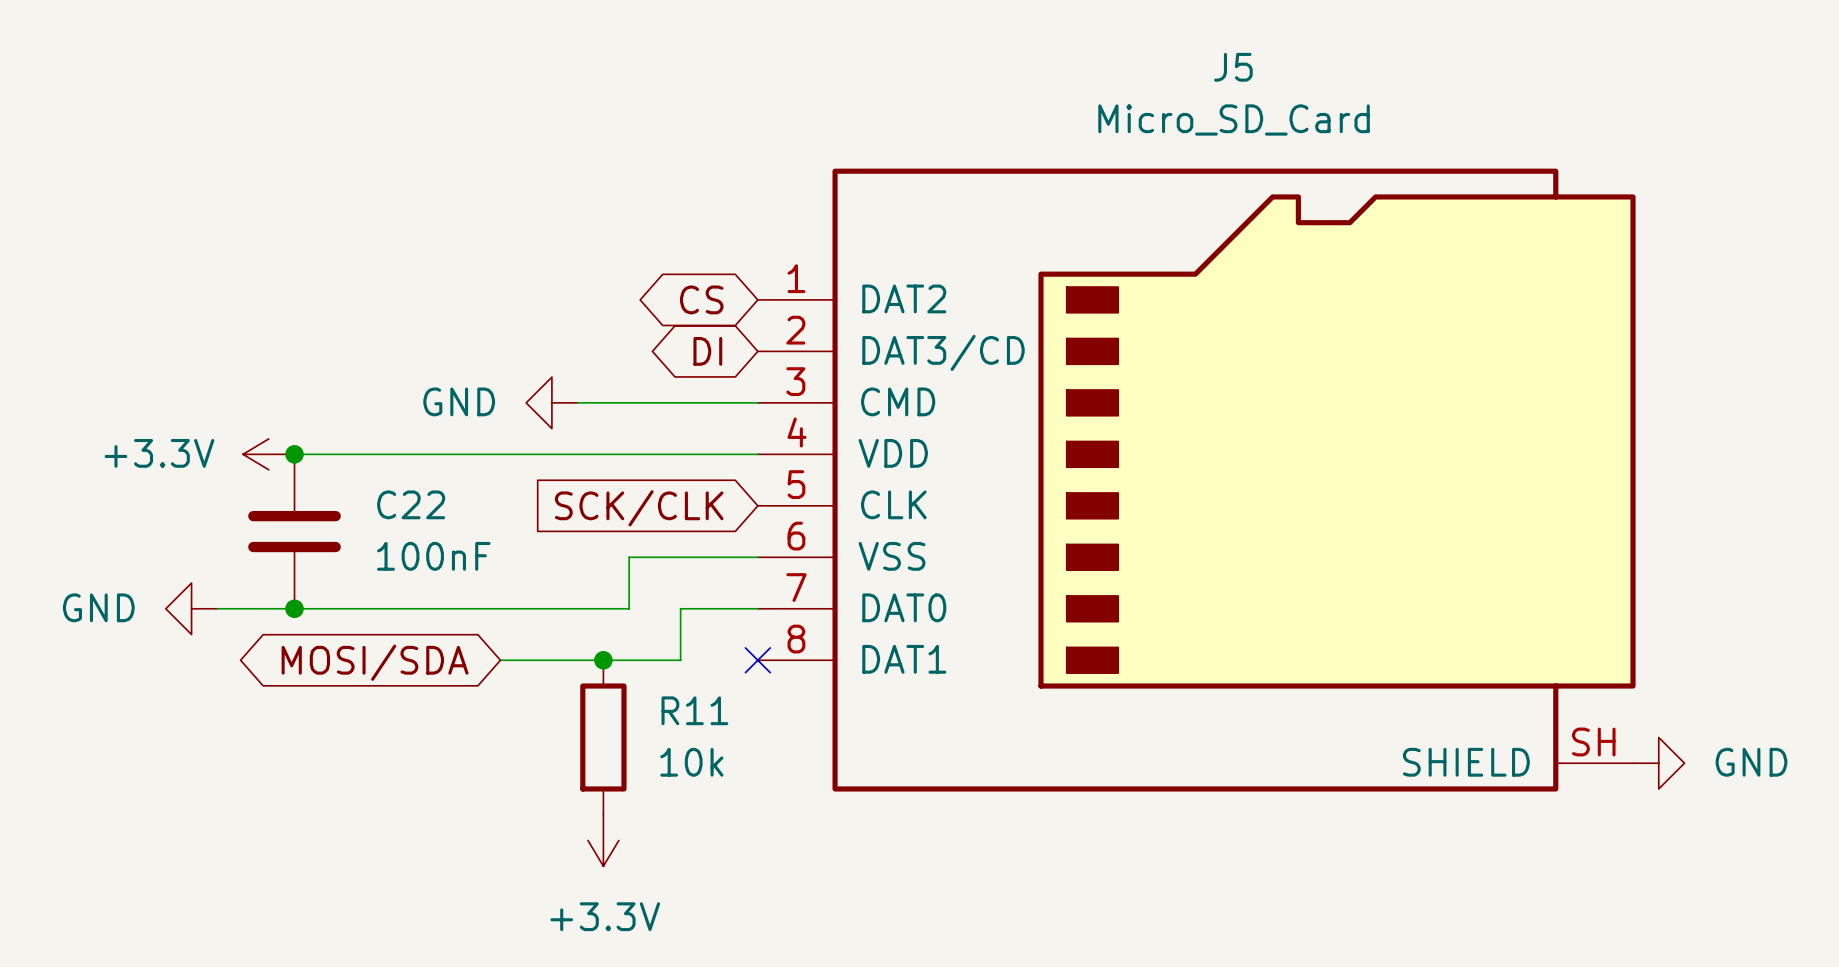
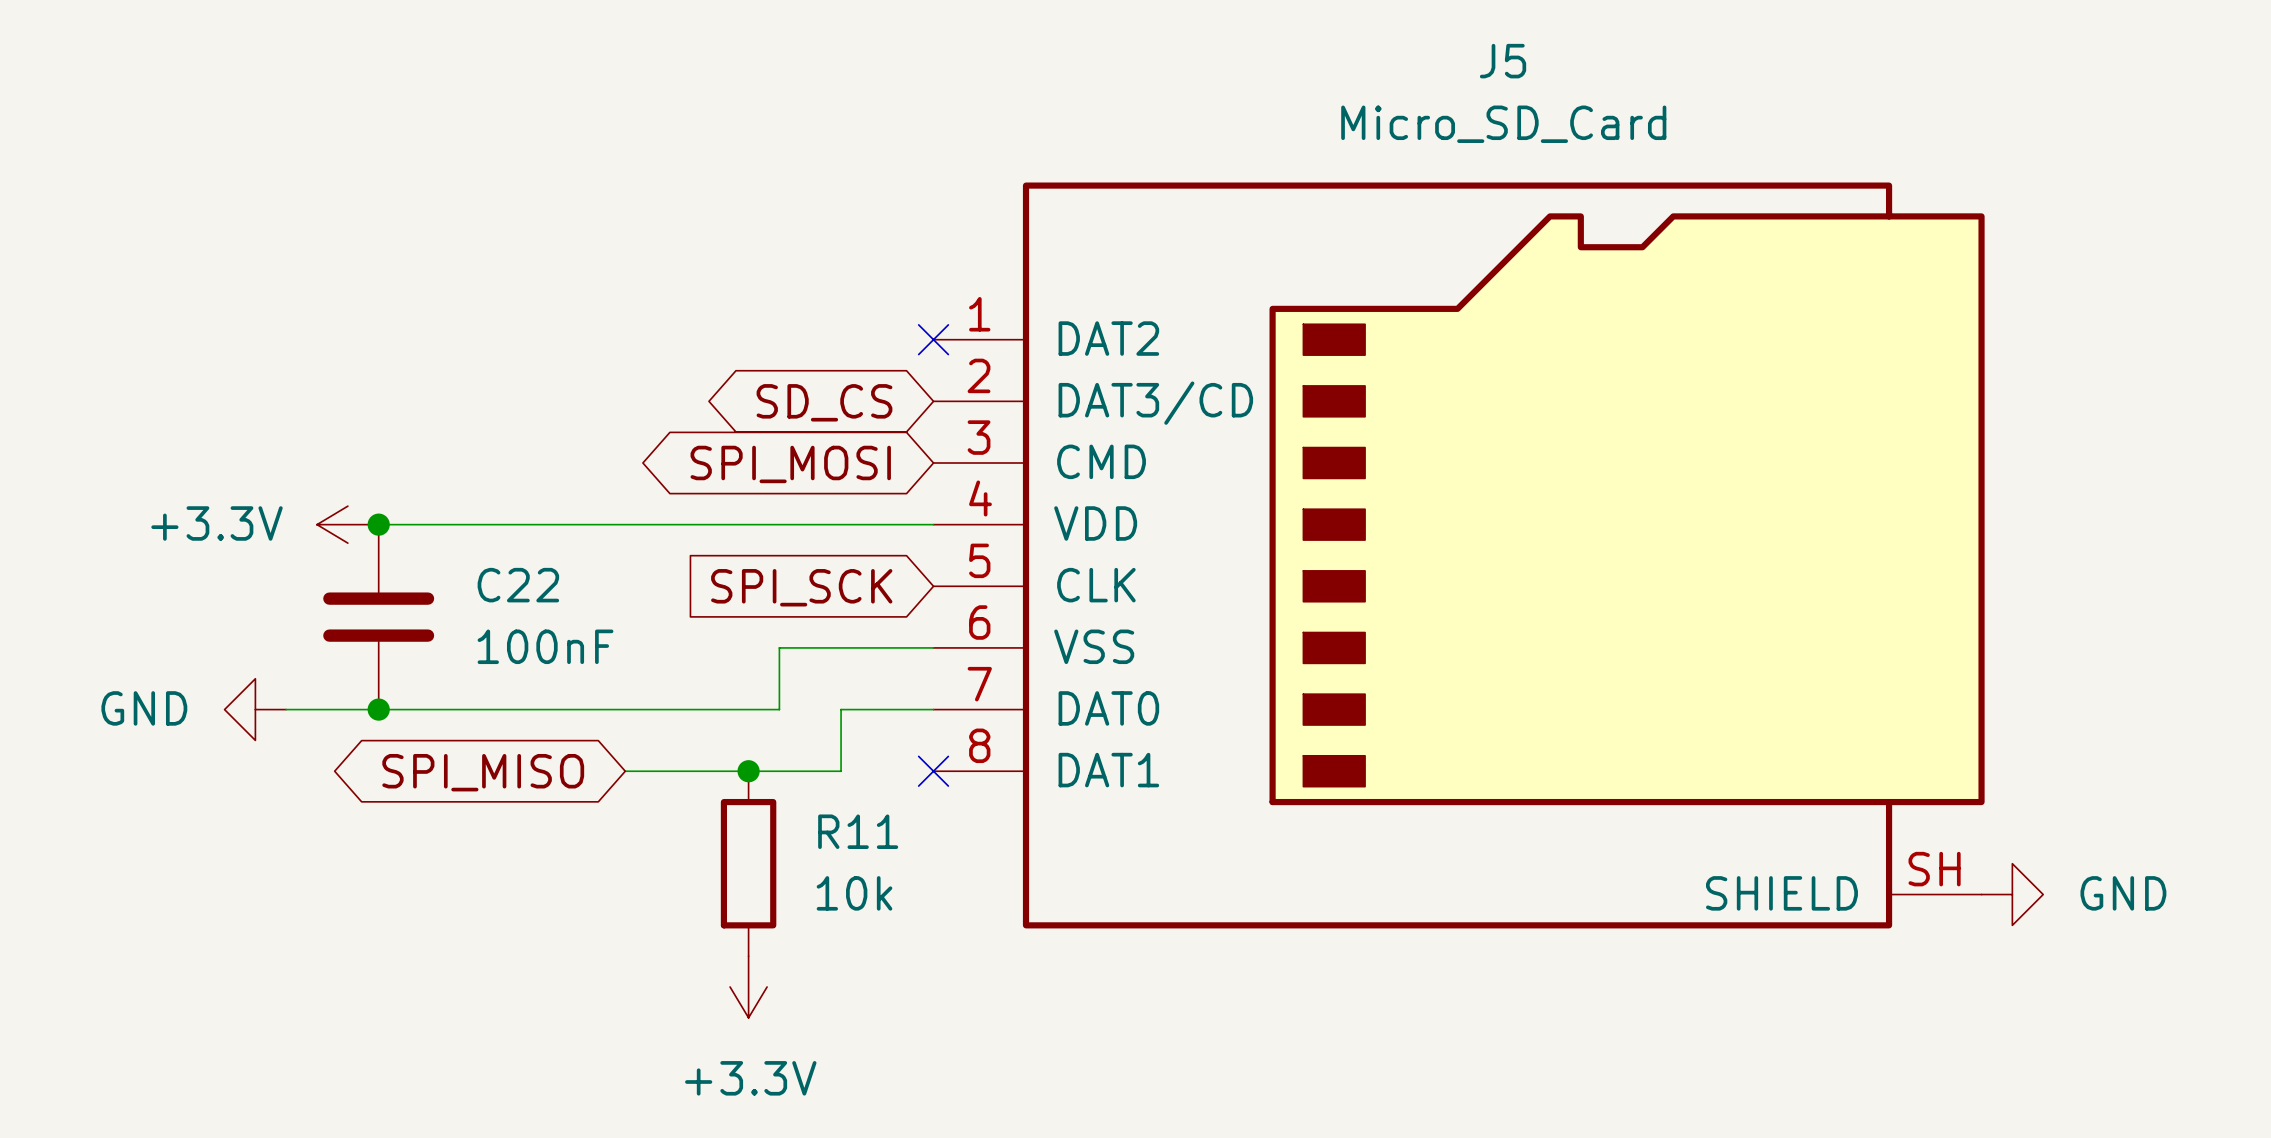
global label: CS (701, 299) -> none
no-connect mark: none -> (933, 339)
global label: DI (707, 351) -> SD_CS (824, 402)
power symbol: GND (551, 402) -> none
wire: (577, 402) (757, 402) -> none
global label: none -> SPI_MOSI (790, 464)
global label: SCK/CLK (639, 508) -> SPI_SCK (801, 587)
global label: MOSI/SDA (375, 662) -> SPI_MISO (483, 772)

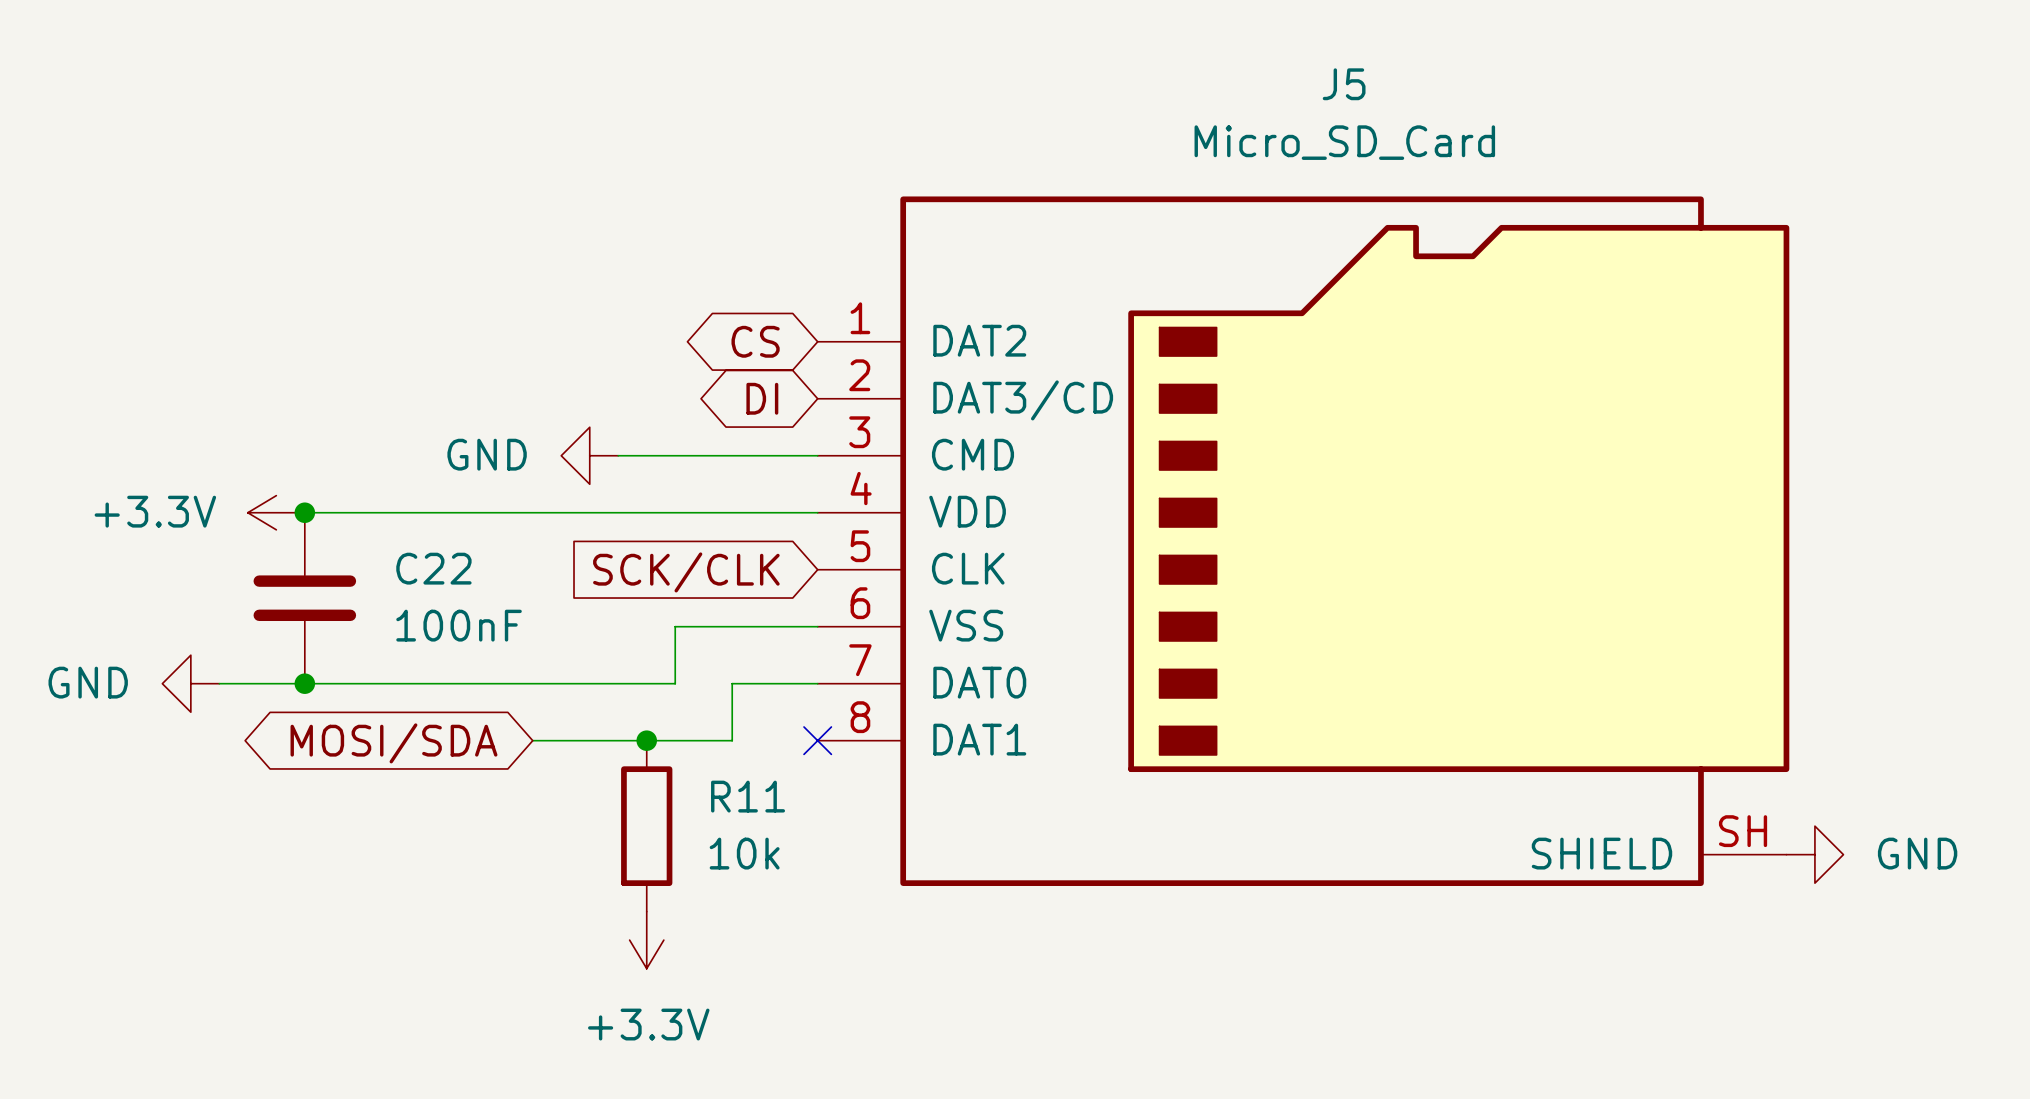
global label: none -> CS (755, 341)
no-connect mark: (933, 339) -> none
global label: SD_CS (824, 402) -> DI (762, 398)
power symbol: none -> GND (589, 455)
wire: none -> (618, 455) (817, 455)
global label: SPI_MOSI (790, 464) -> none
global label: SPI_SCK (801, 587) -> SCK/CLK (686, 572)
global label: SPI_MISO (483, 772) -> MOSI/SDA (393, 743)

